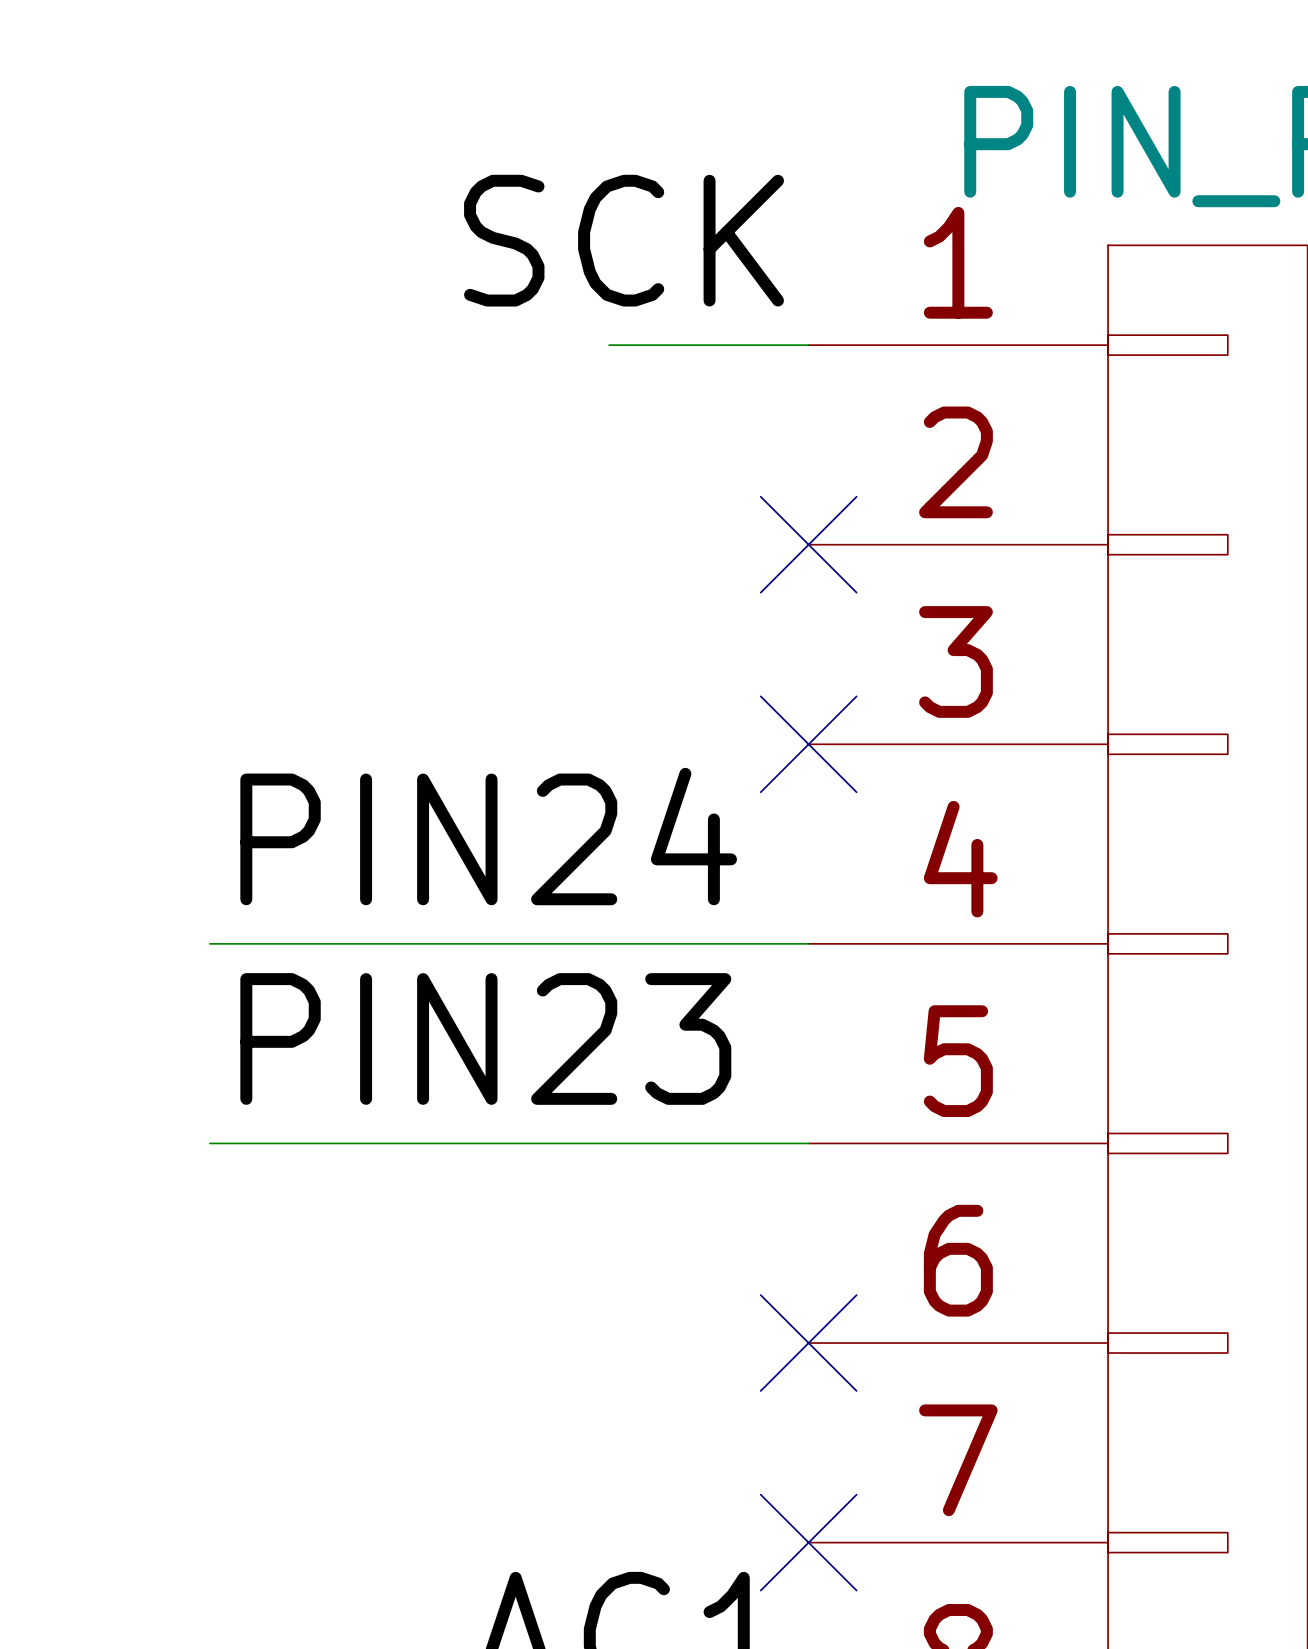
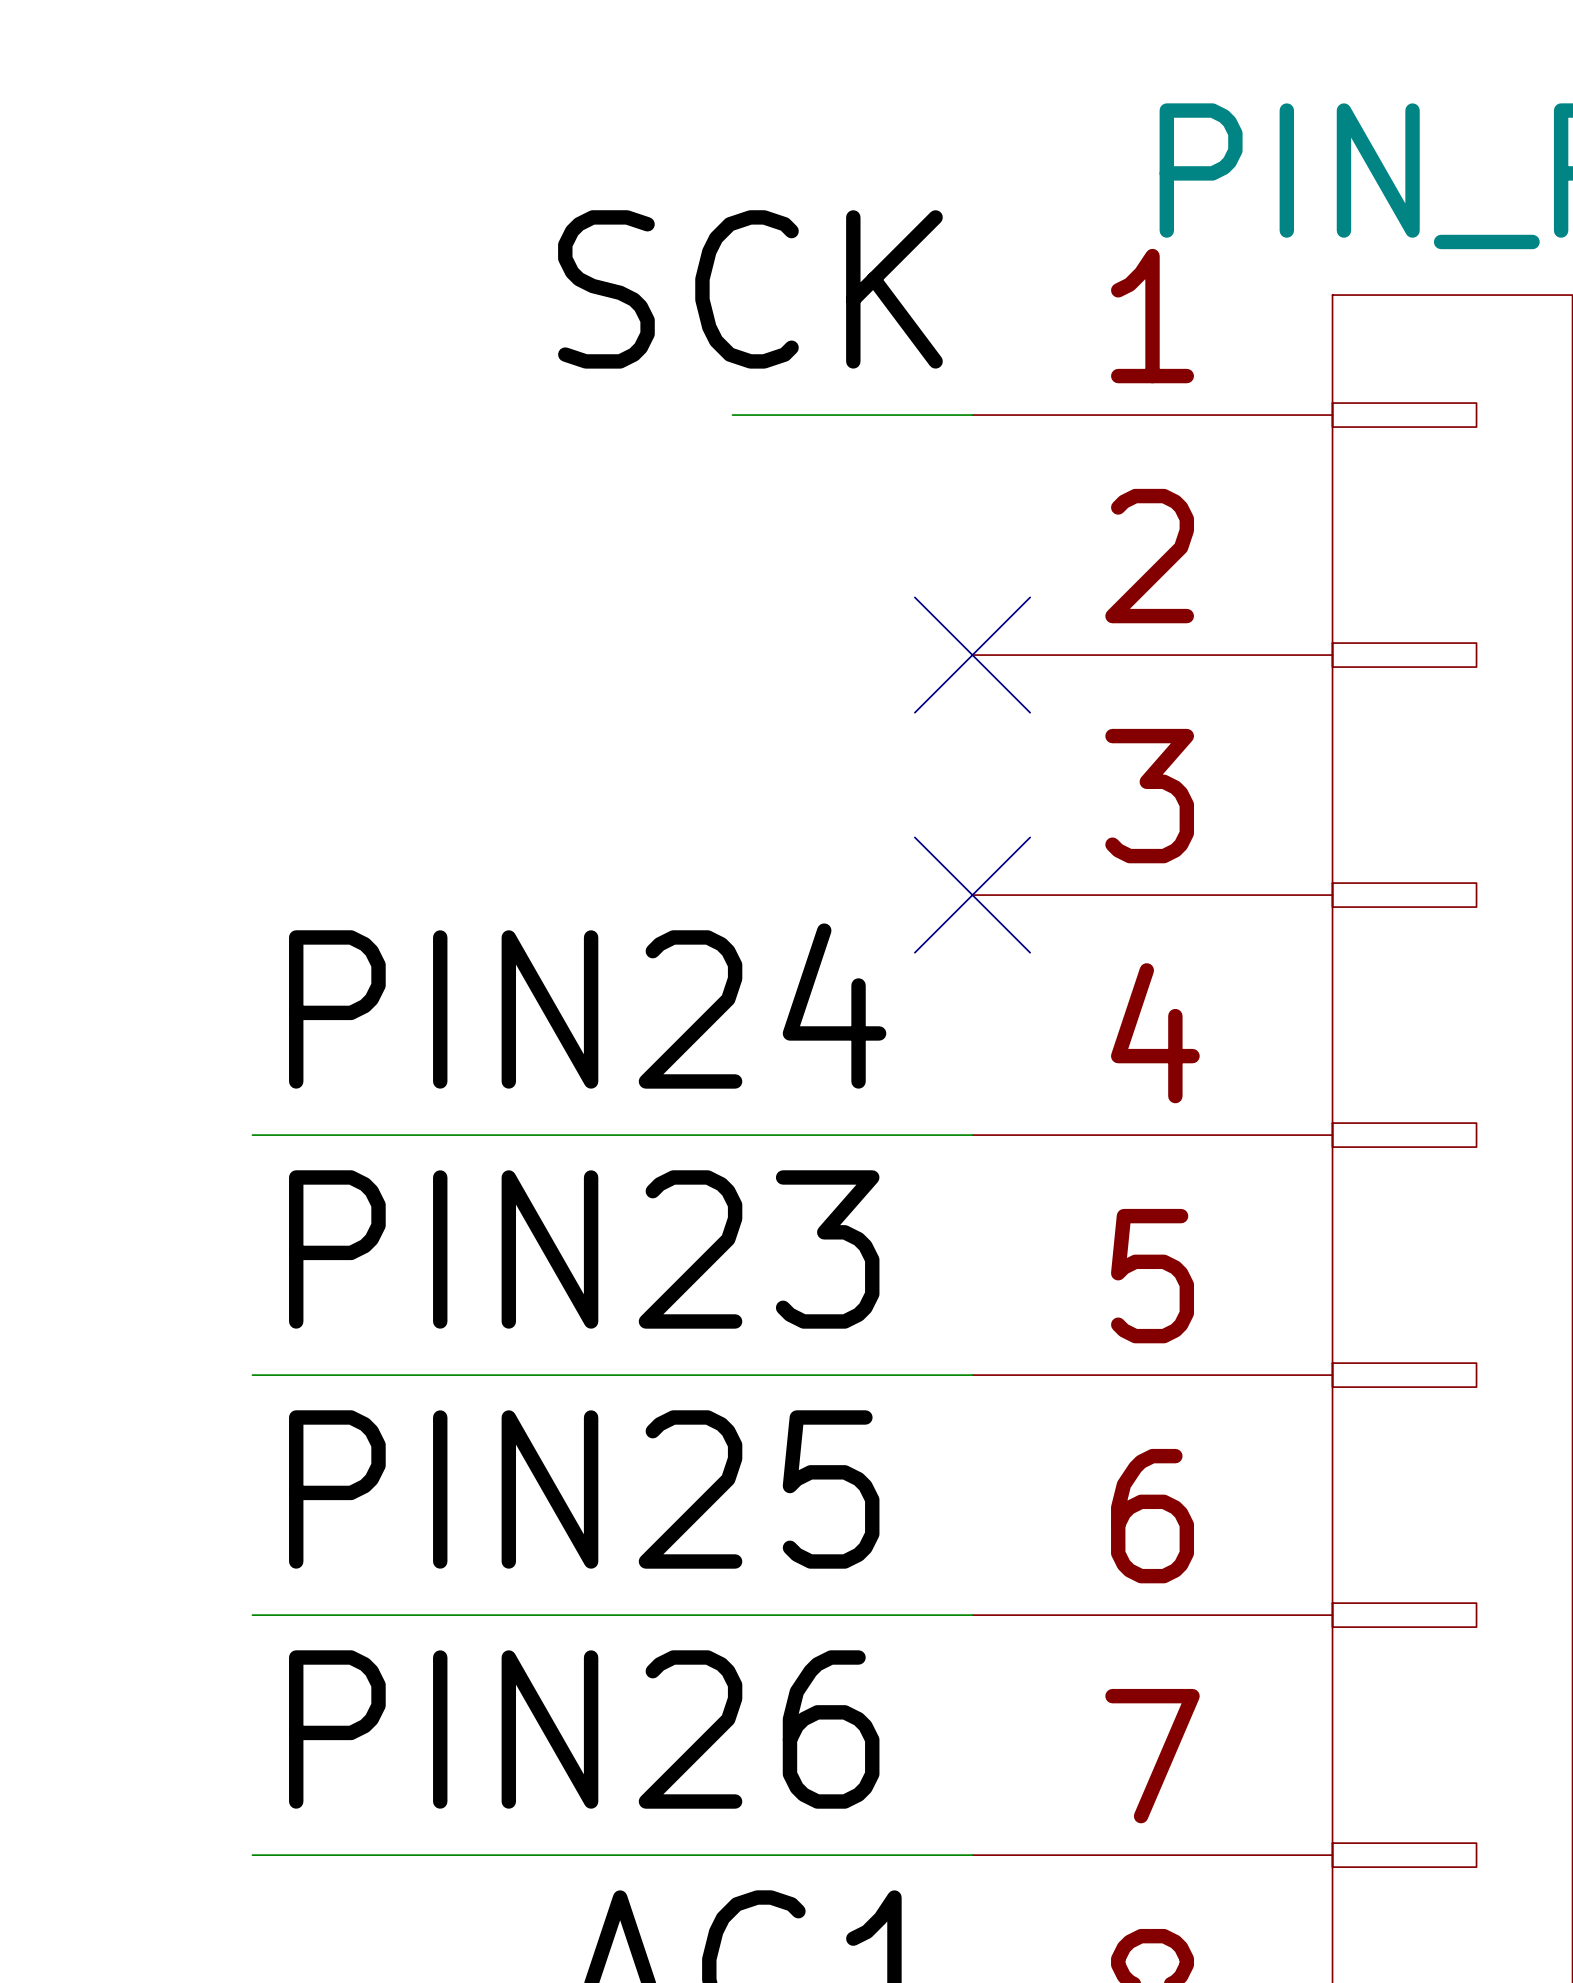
label: none -> PIN25 (584, 1489)
wire: none -> (252, 1615) (972, 1615)
no-connect mark: (808, 1343) -> none
label: none -> PIN26 (584, 1729)
wire: none -> (252, 1855) (972, 1855)
no-connect mark: (808, 1542) -> none

